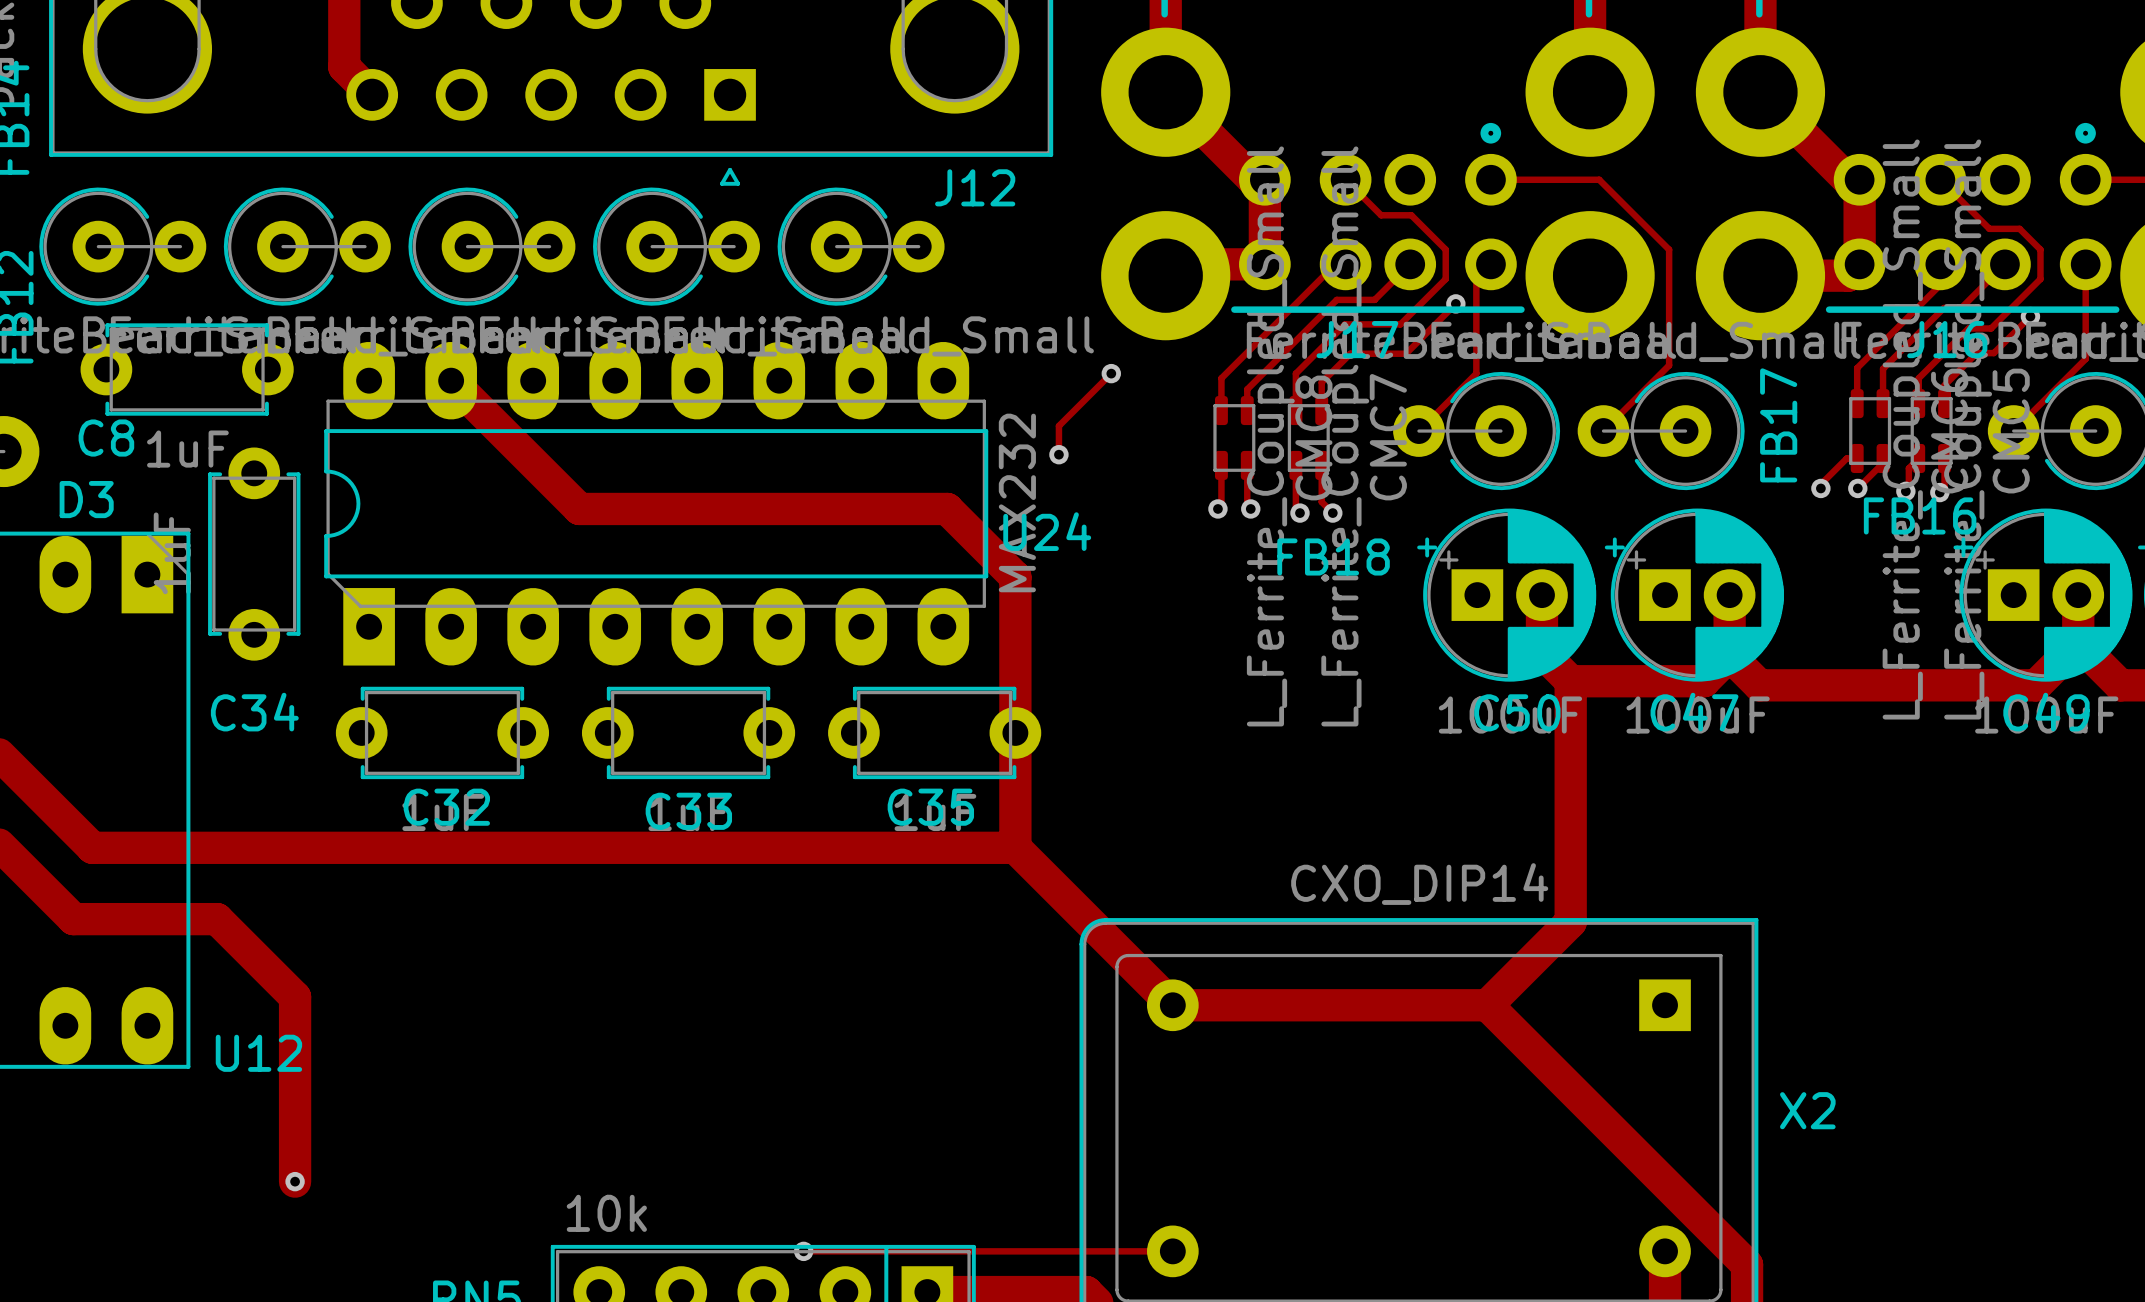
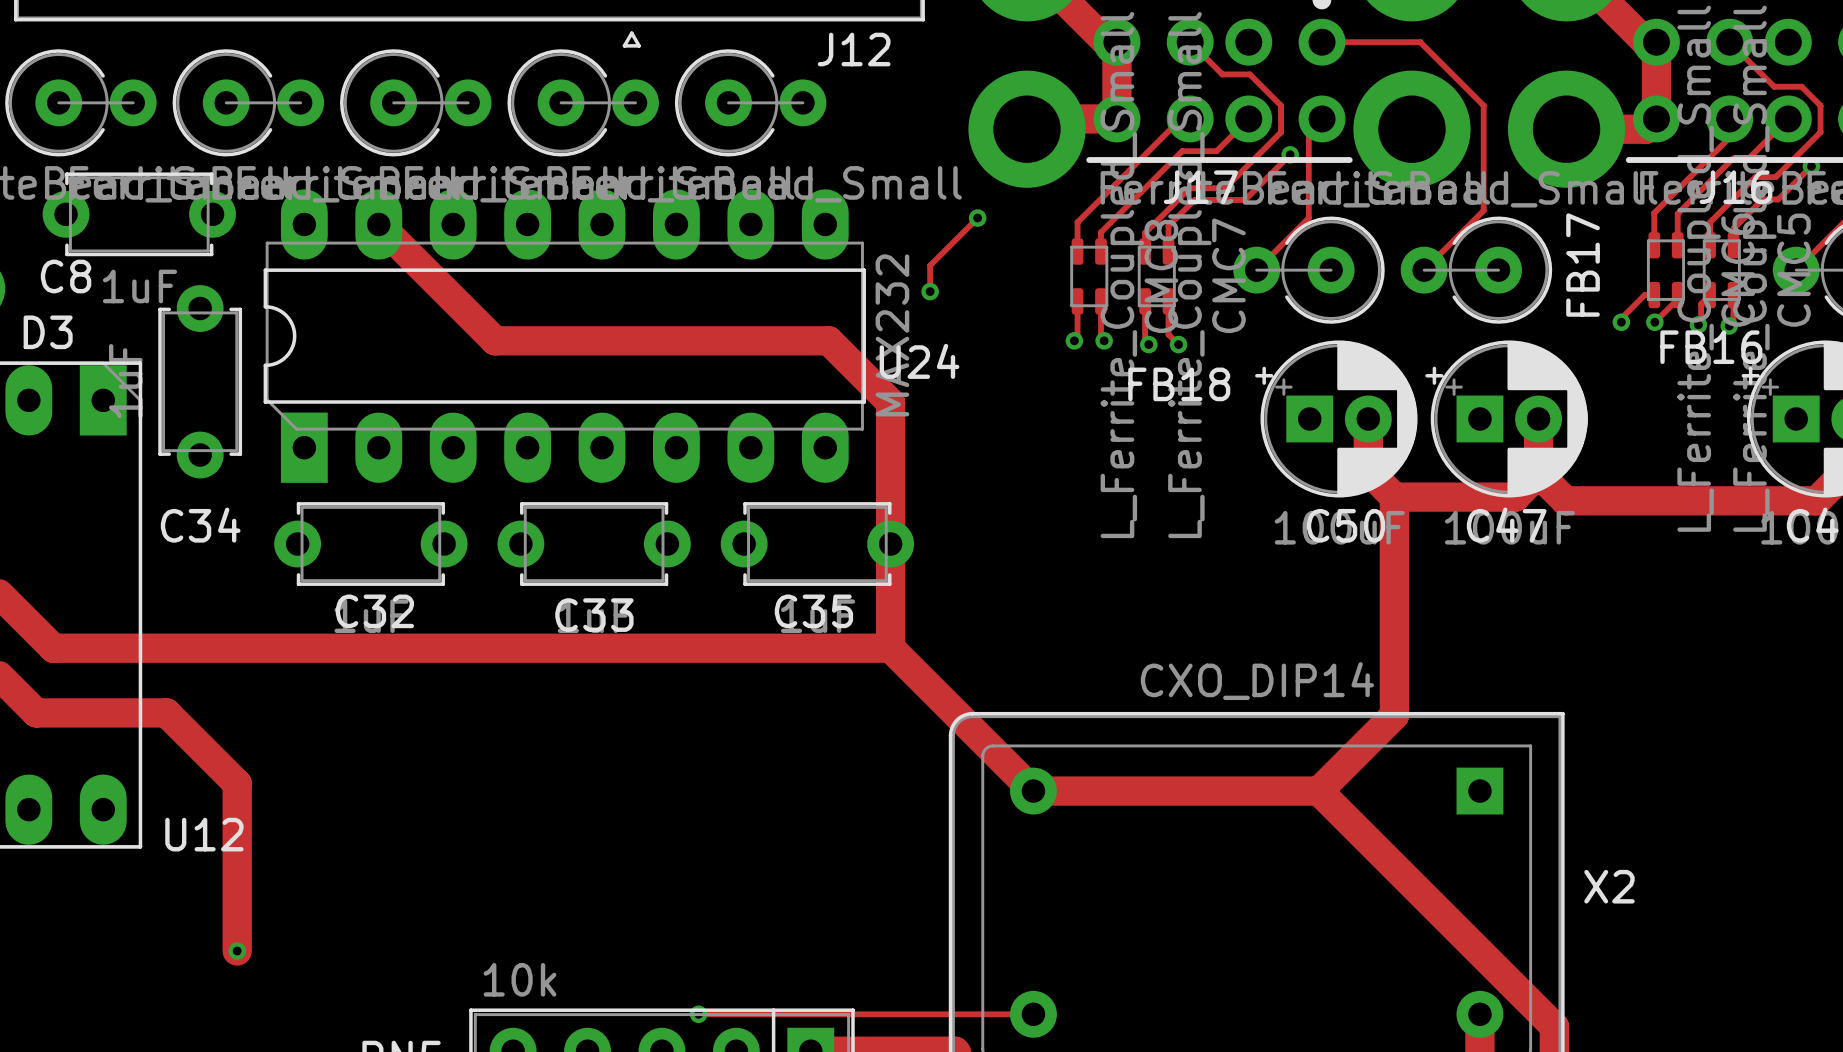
track: (1400, 324) (1345, 324) (1295, 373) (1295, 390) -> (1239, 173) (1225, 188) (1189, 188) (1145, 232)

